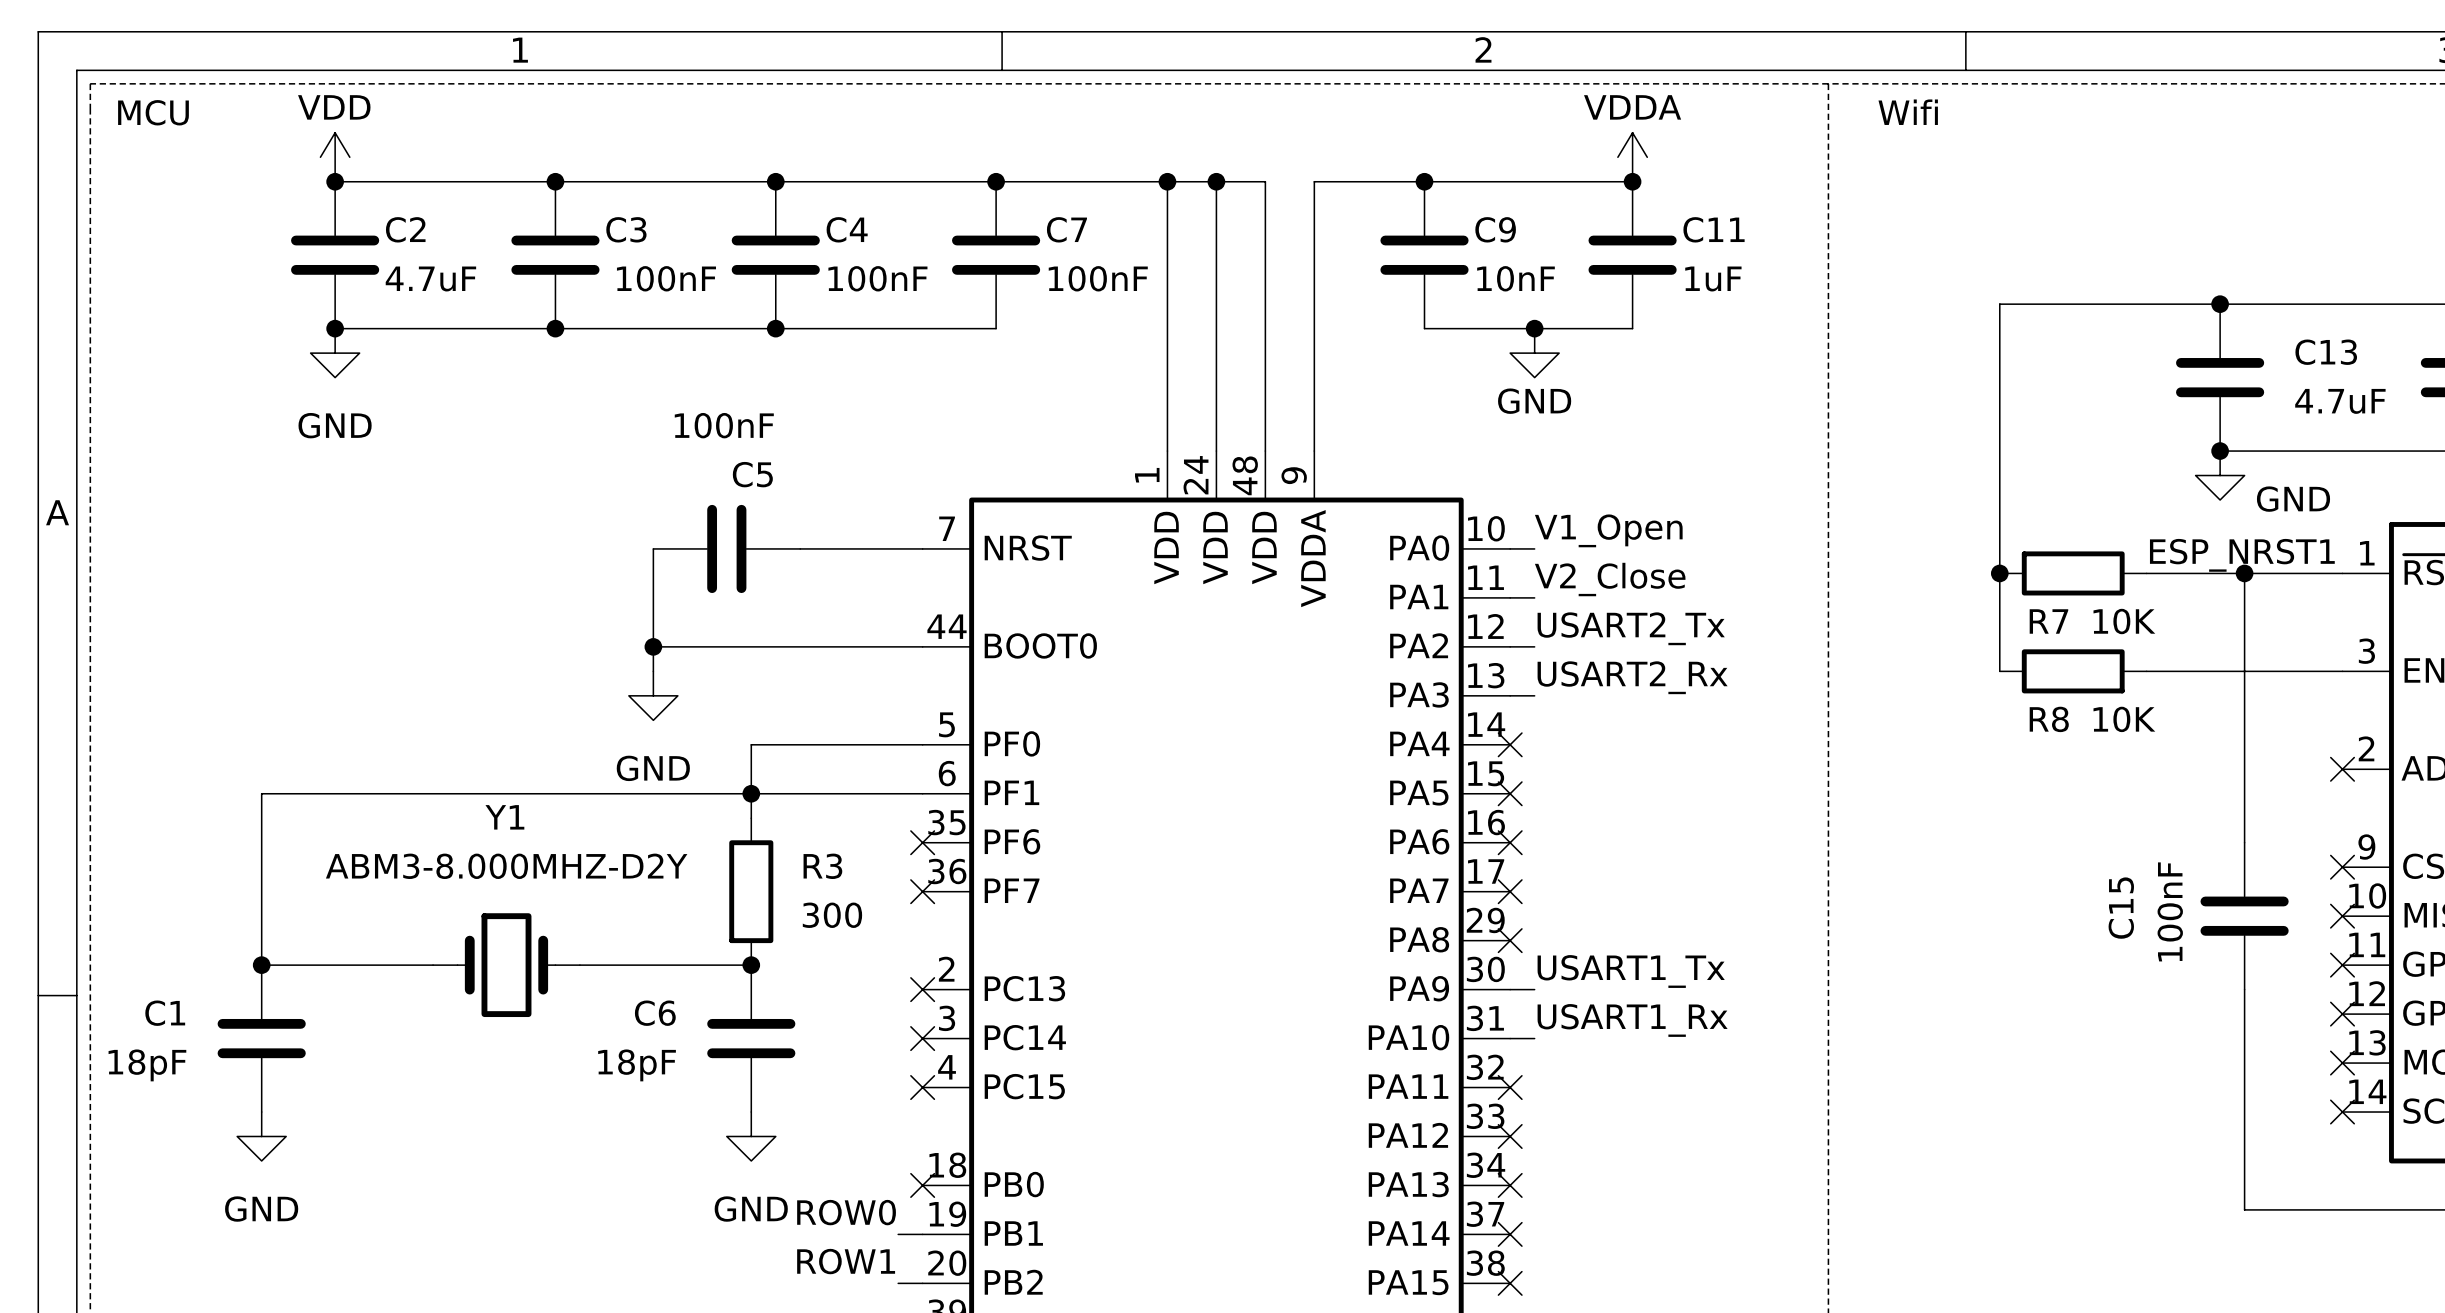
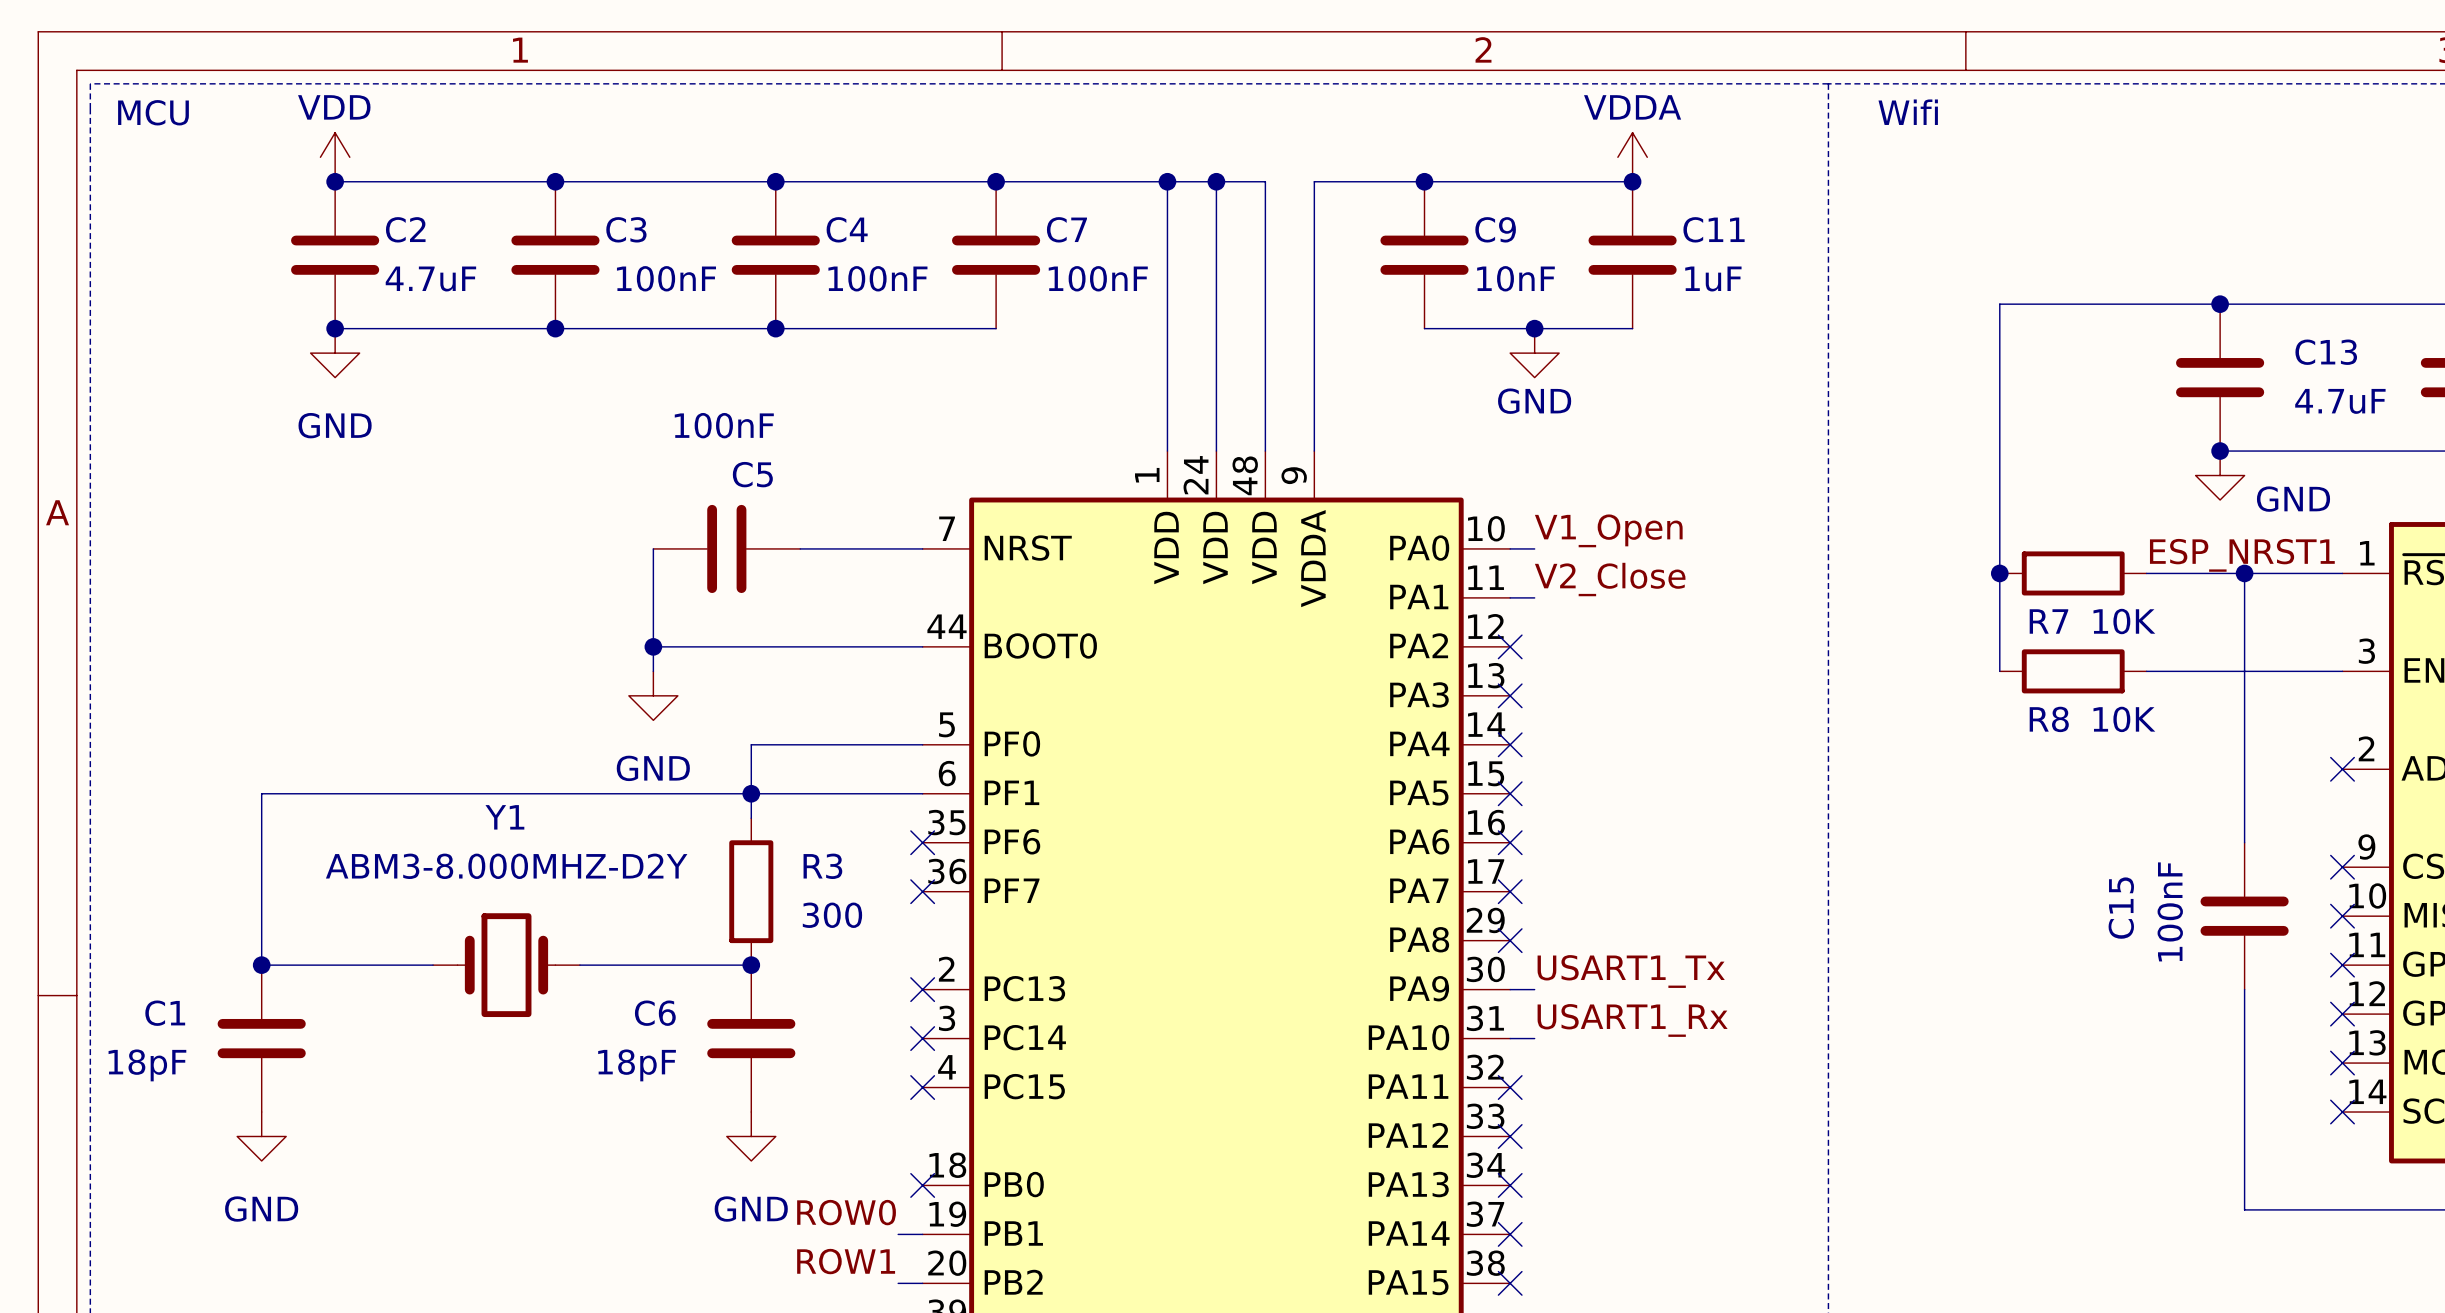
label: USART2_Tx (1631, 628) -> none
wire: (1510, 646) (1534, 646) -> none
no-connect mark: none -> (1510, 646)
label: USART2_Rx (1632, 677) -> none
wire: (1510, 695) (1534, 695) -> none
no-connect mark: none -> (1510, 695)

